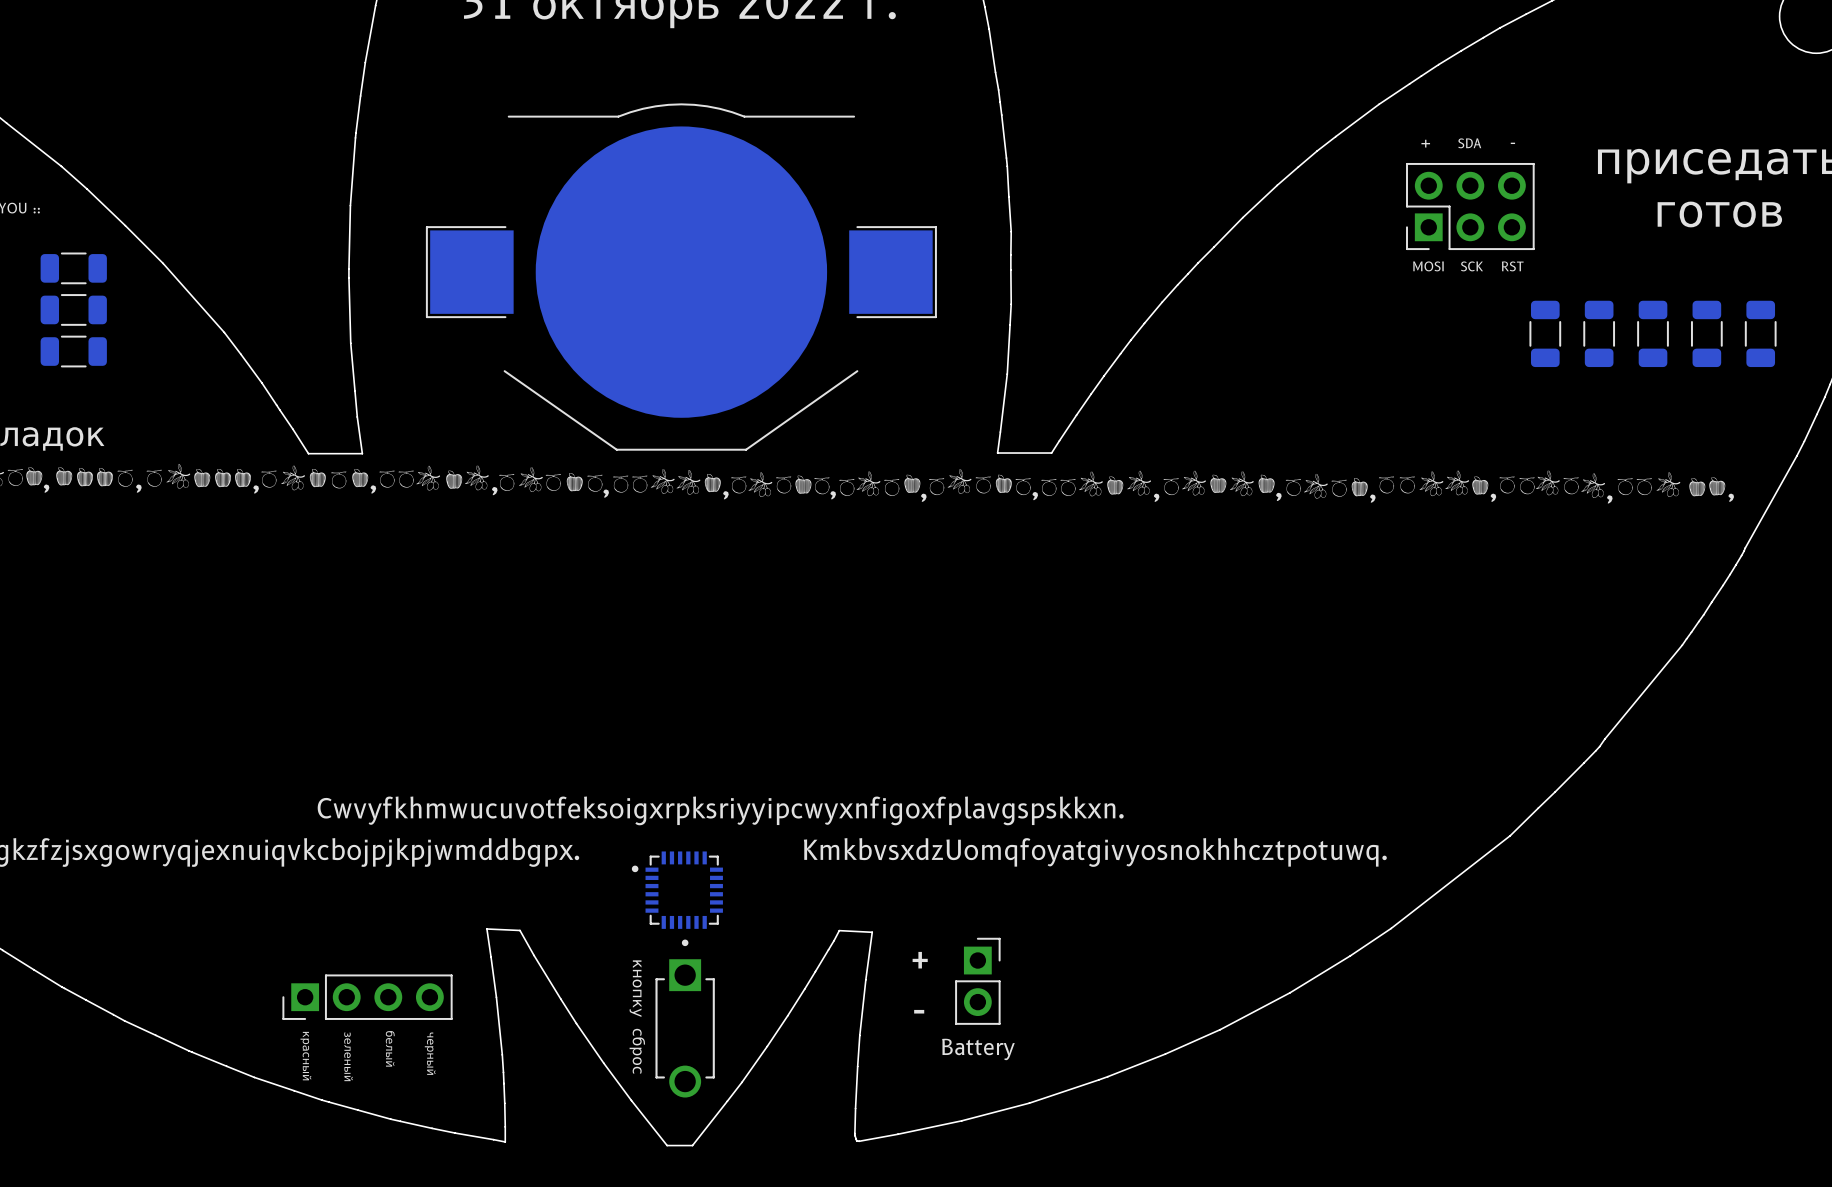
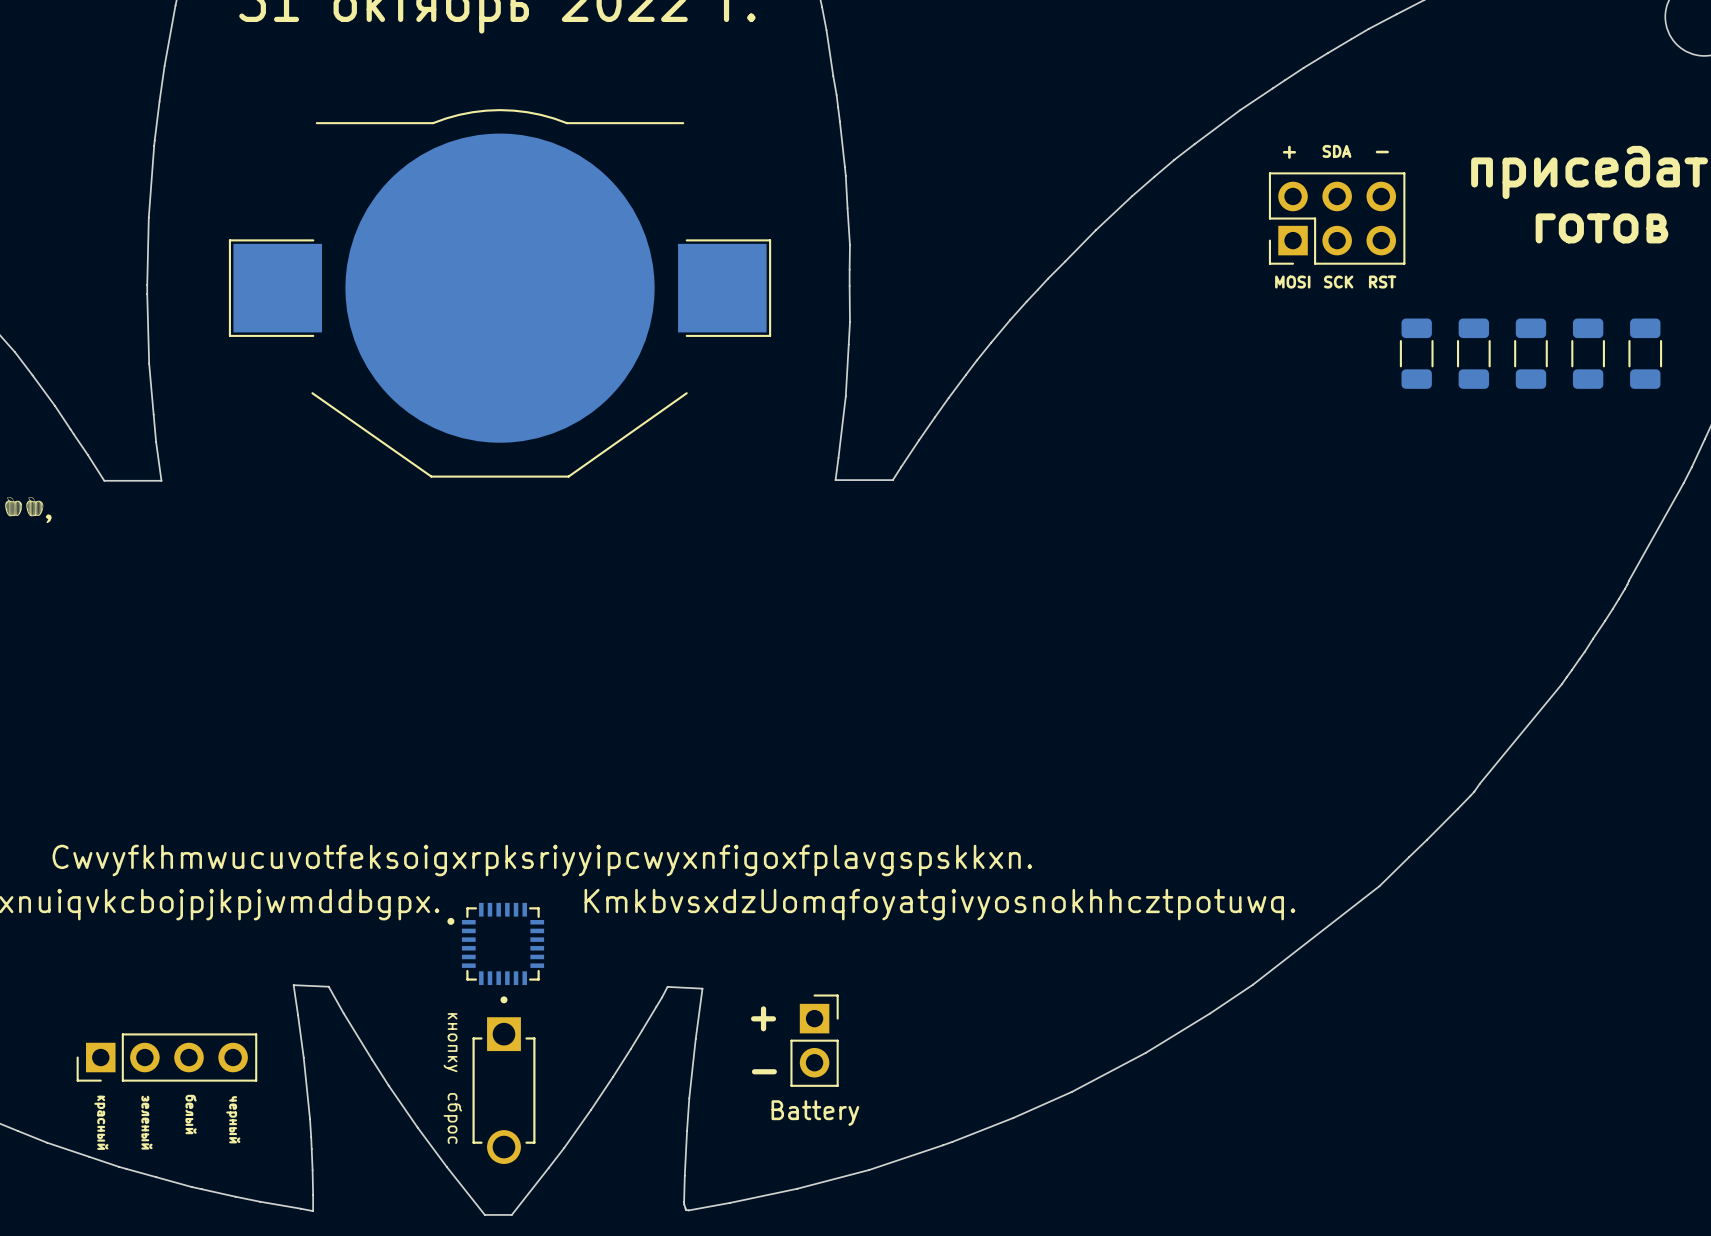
drawing: [261, 465, 1735, 504] -> none

